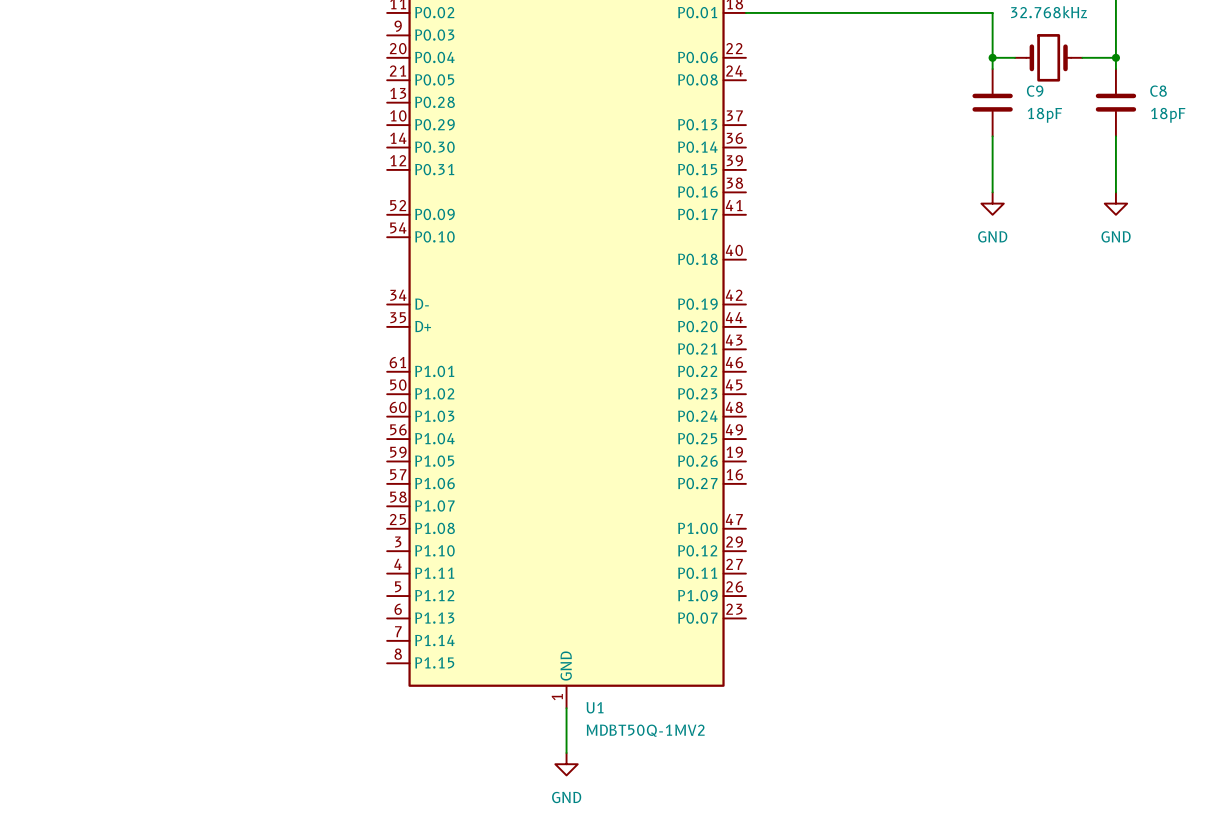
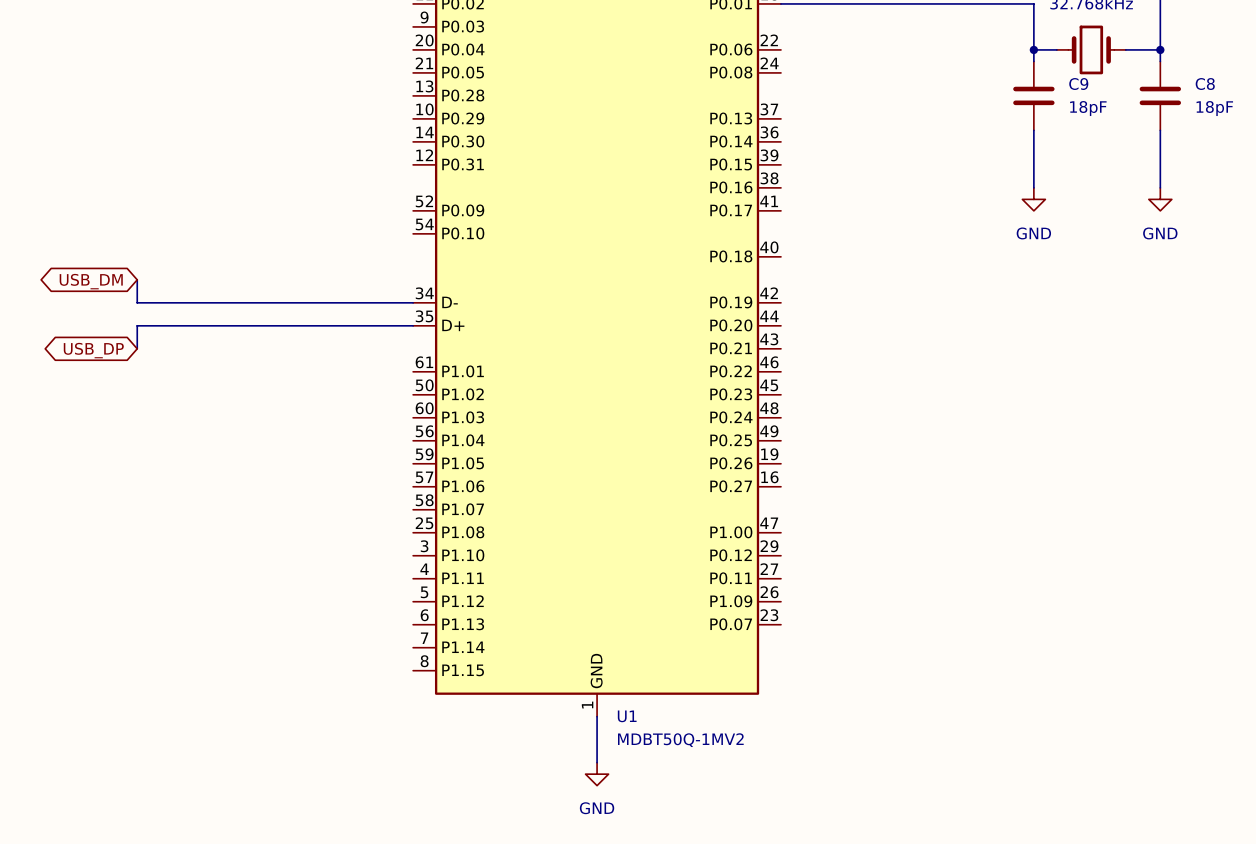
wire: none -> (137, 279) (137, 302) (413, 302)
global label: none -> USB_DM (91, 281)
wire: none -> (413, 325) (137, 325) (137, 348)
global label: none -> USB_DP (93, 350)

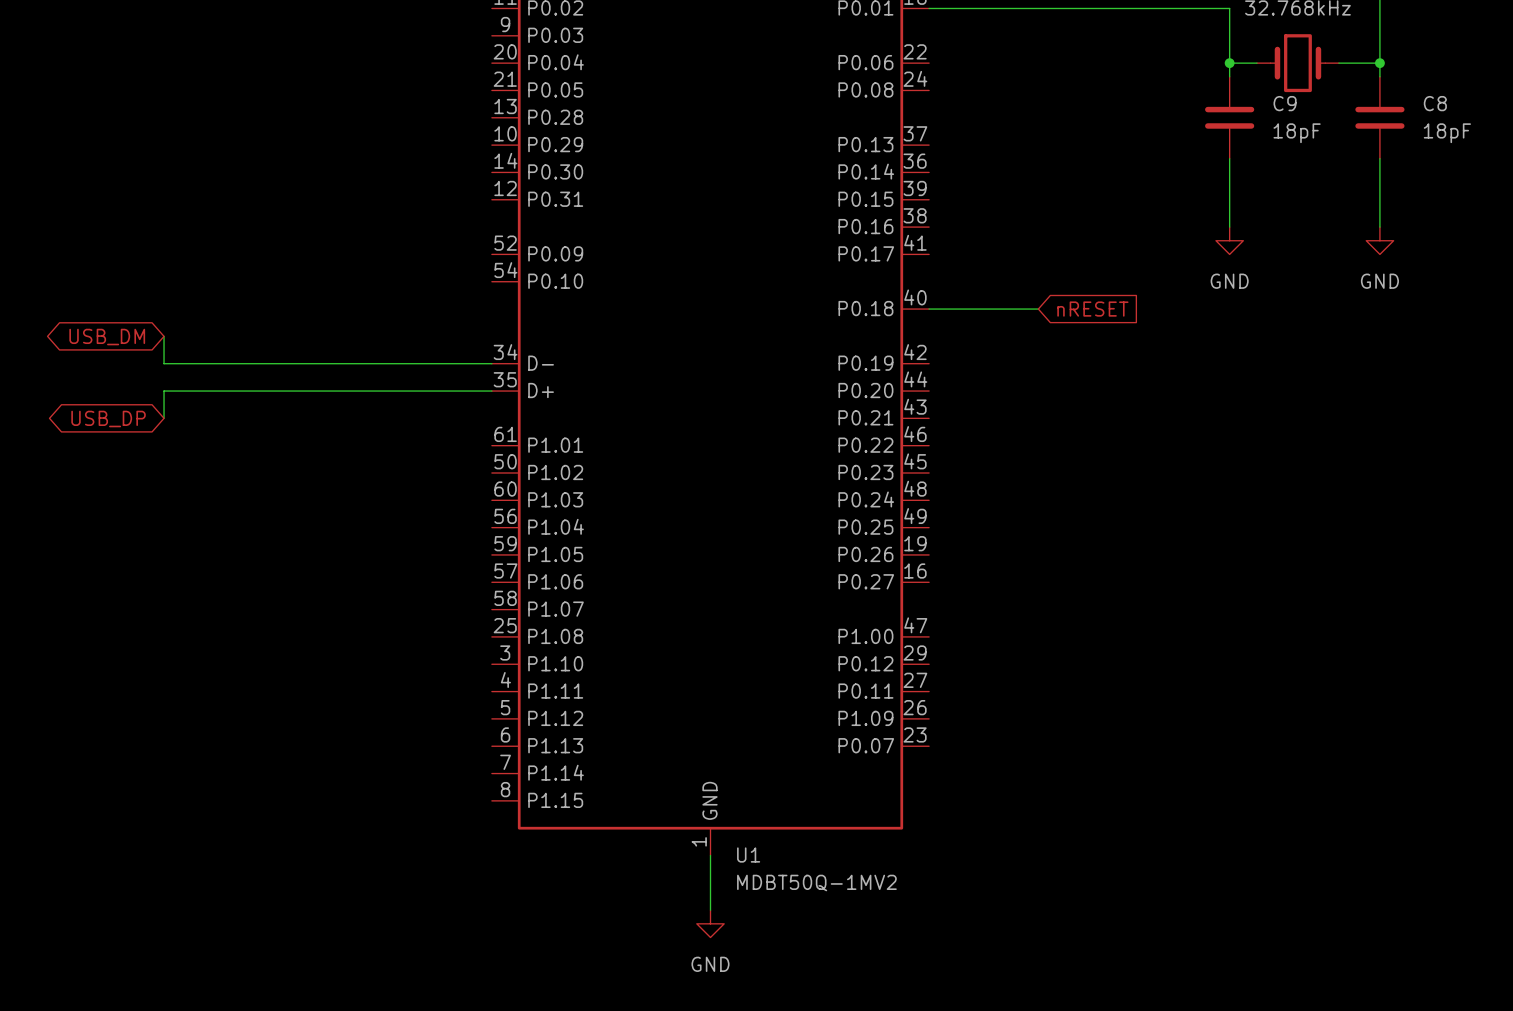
wire: none -> (929, 309) (1038, 309)
global label: none -> nRESET (1092, 309)

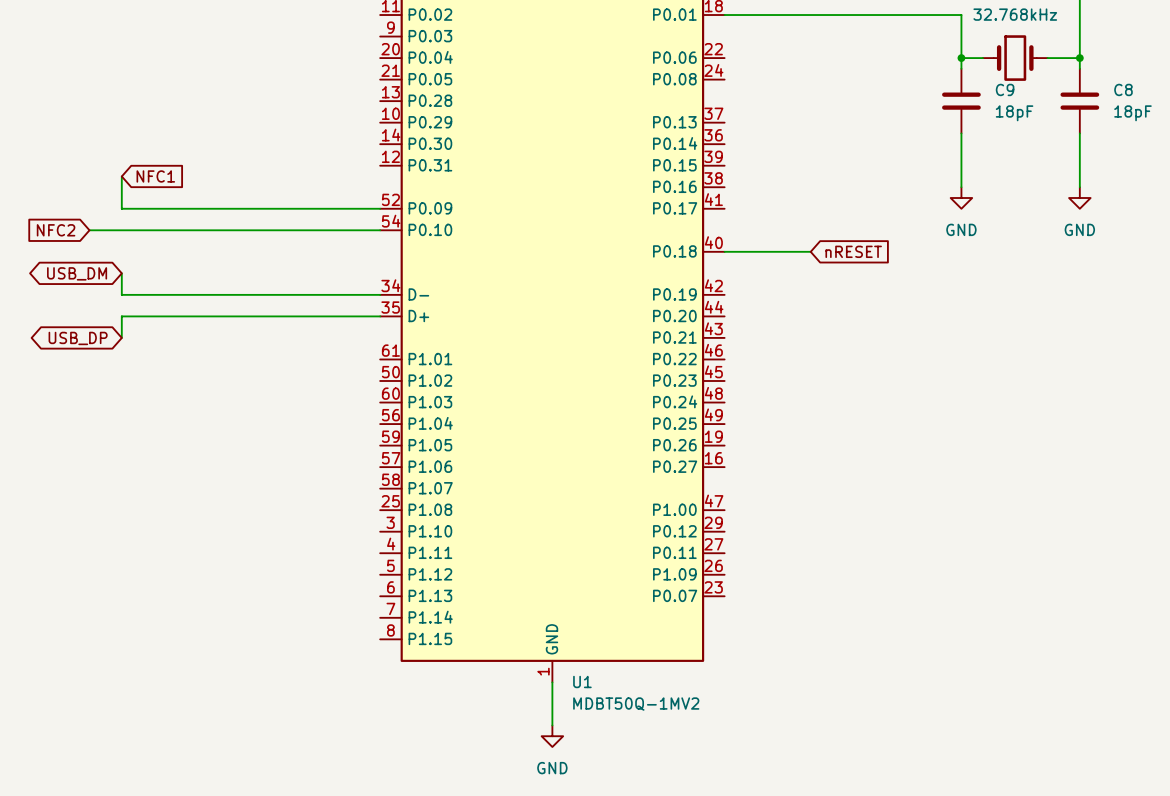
wire: none -> (121, 176) (121, 208) (380, 208)
global label: none -> NFC1 (155, 176)
global label: none -> NFC2 (56, 230)
wire: none -> (89, 230) (380, 230)

